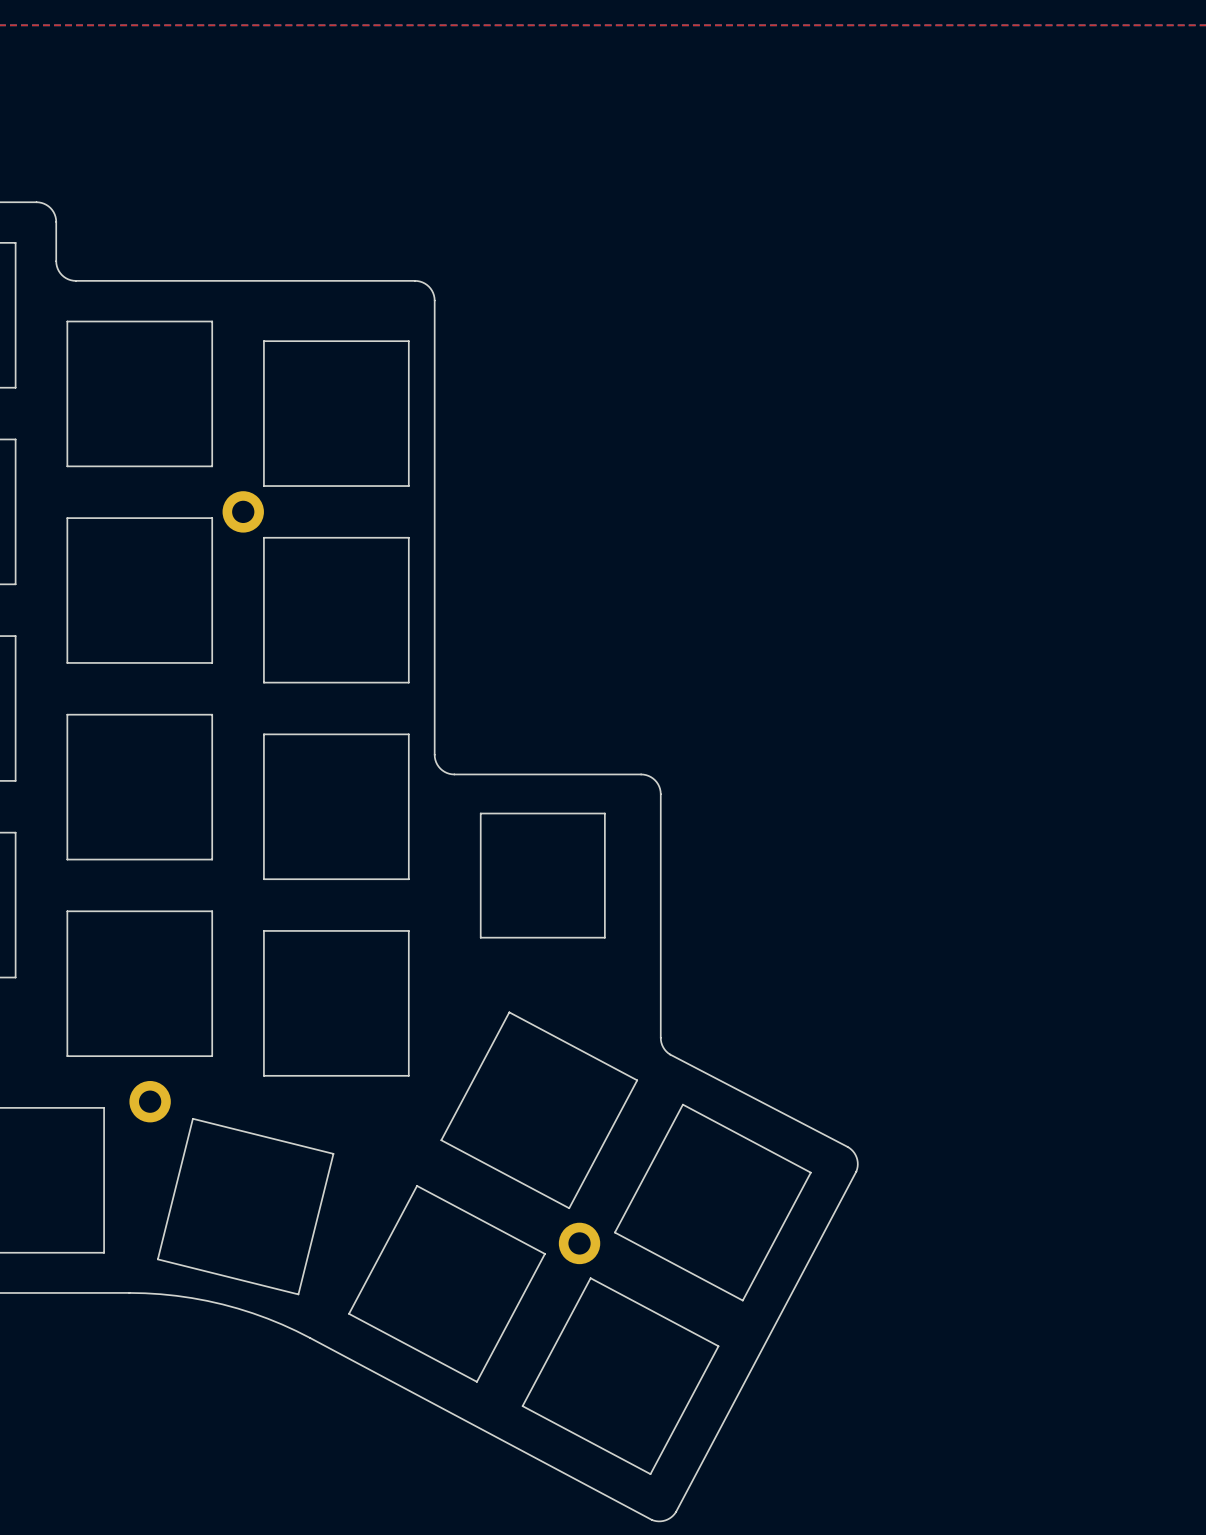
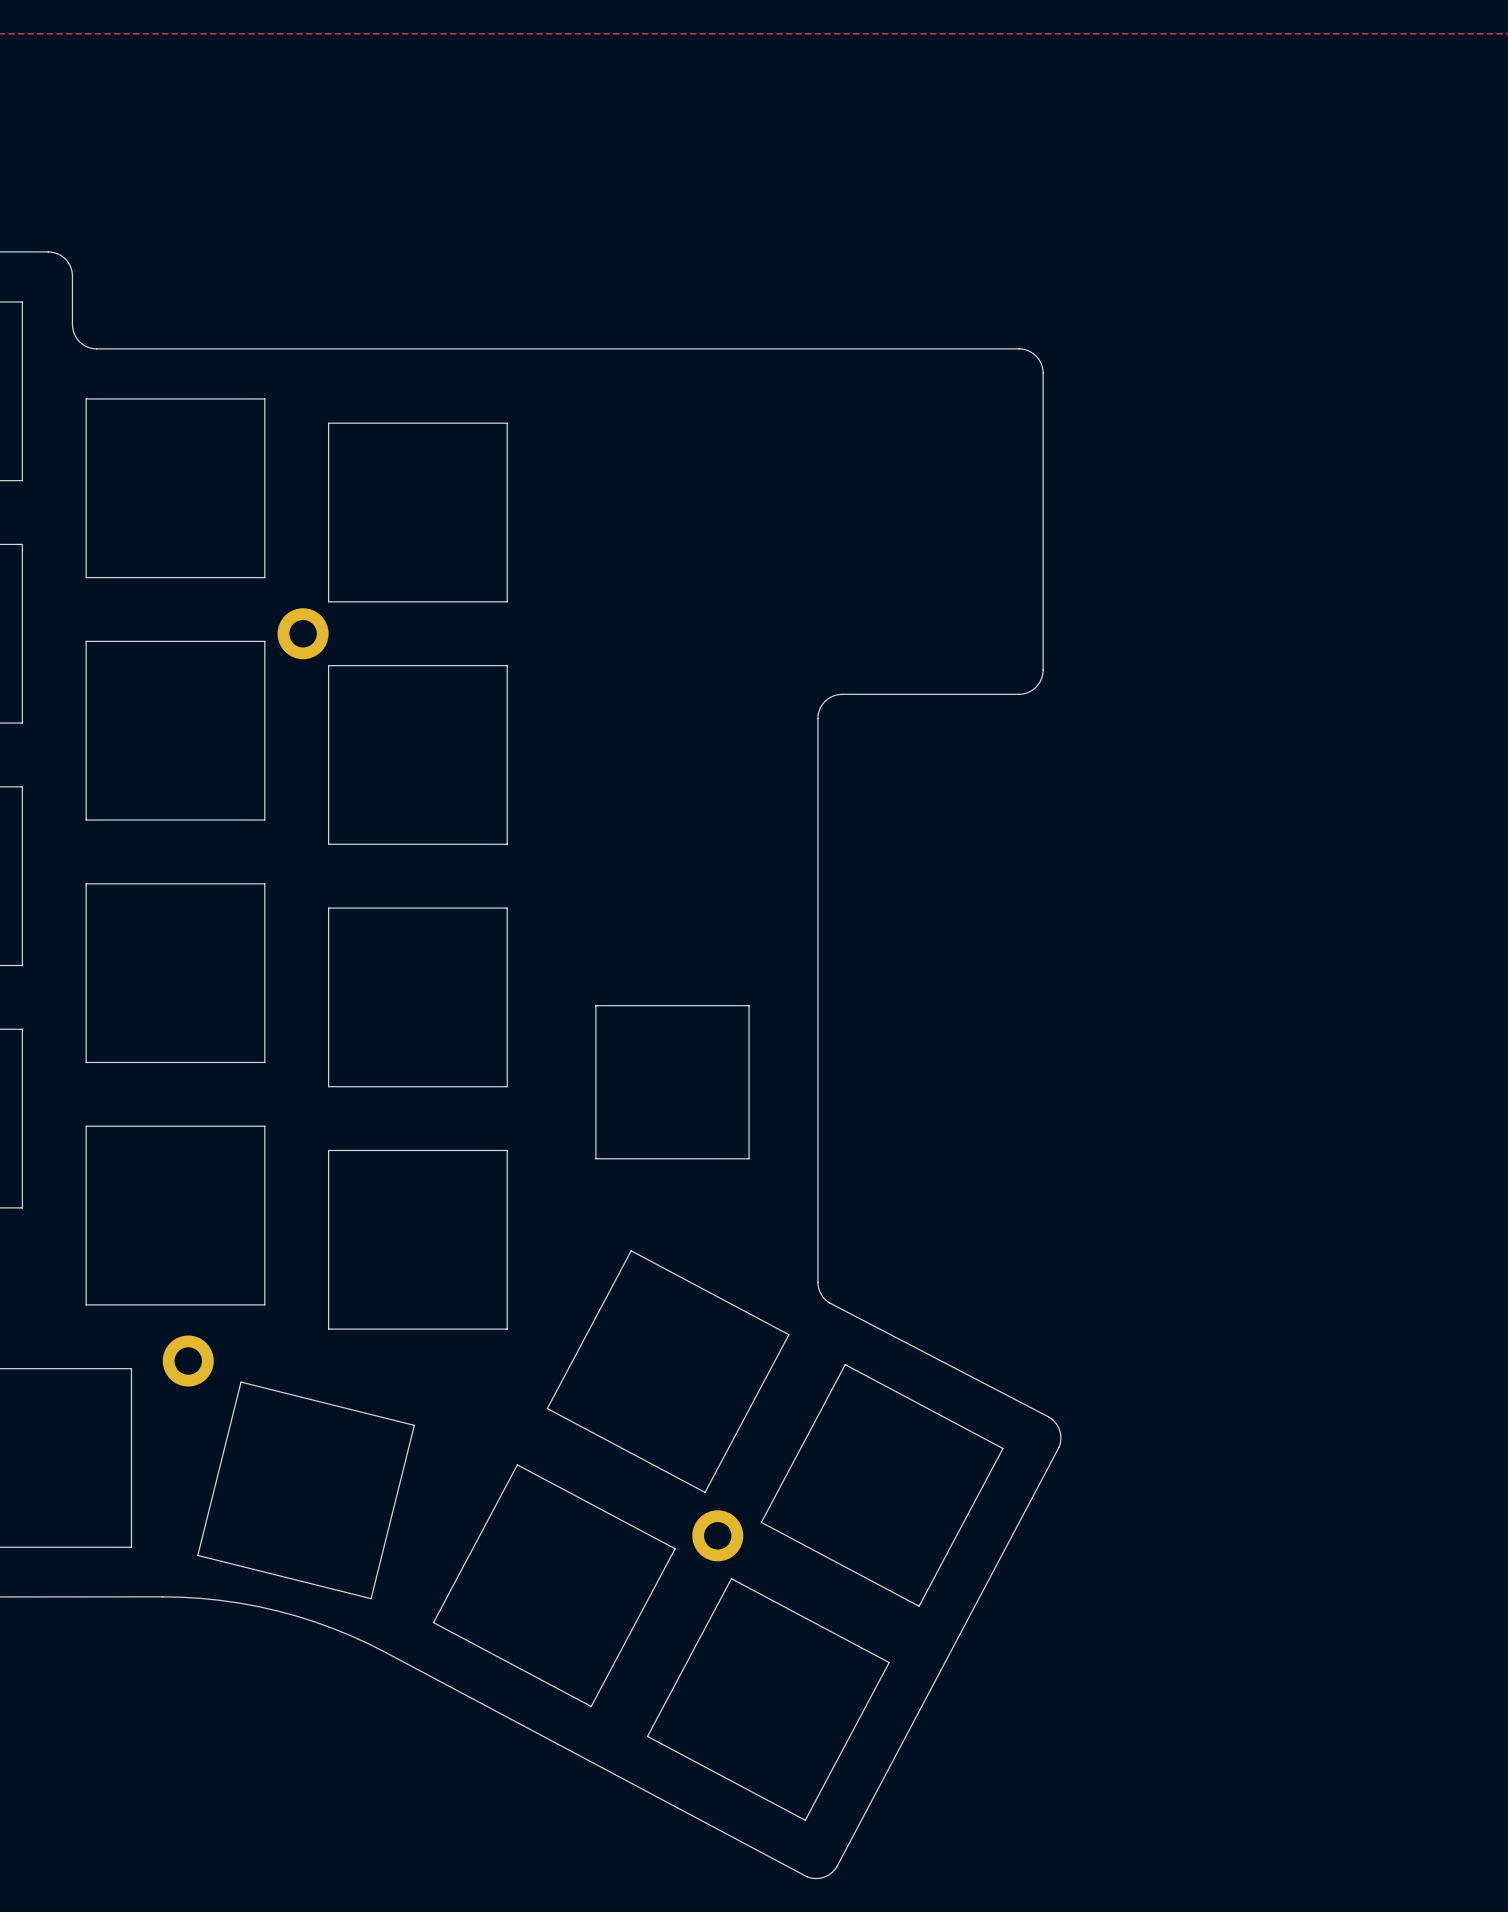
board edge: (415, 280) (428, 286) (434, 300) (436, 762) (442, 770) (454, 774) (643, 774) (656, 782) (660, 794) -> (514, 348) (1018, 348) (1031, 352) (1041, 363) (1043, 373) (1043, 670) (1041, 679) (1033, 689) (1022, 694) (842, 694) (832, 696) (822, 703) (817, 718) (817, 981)

